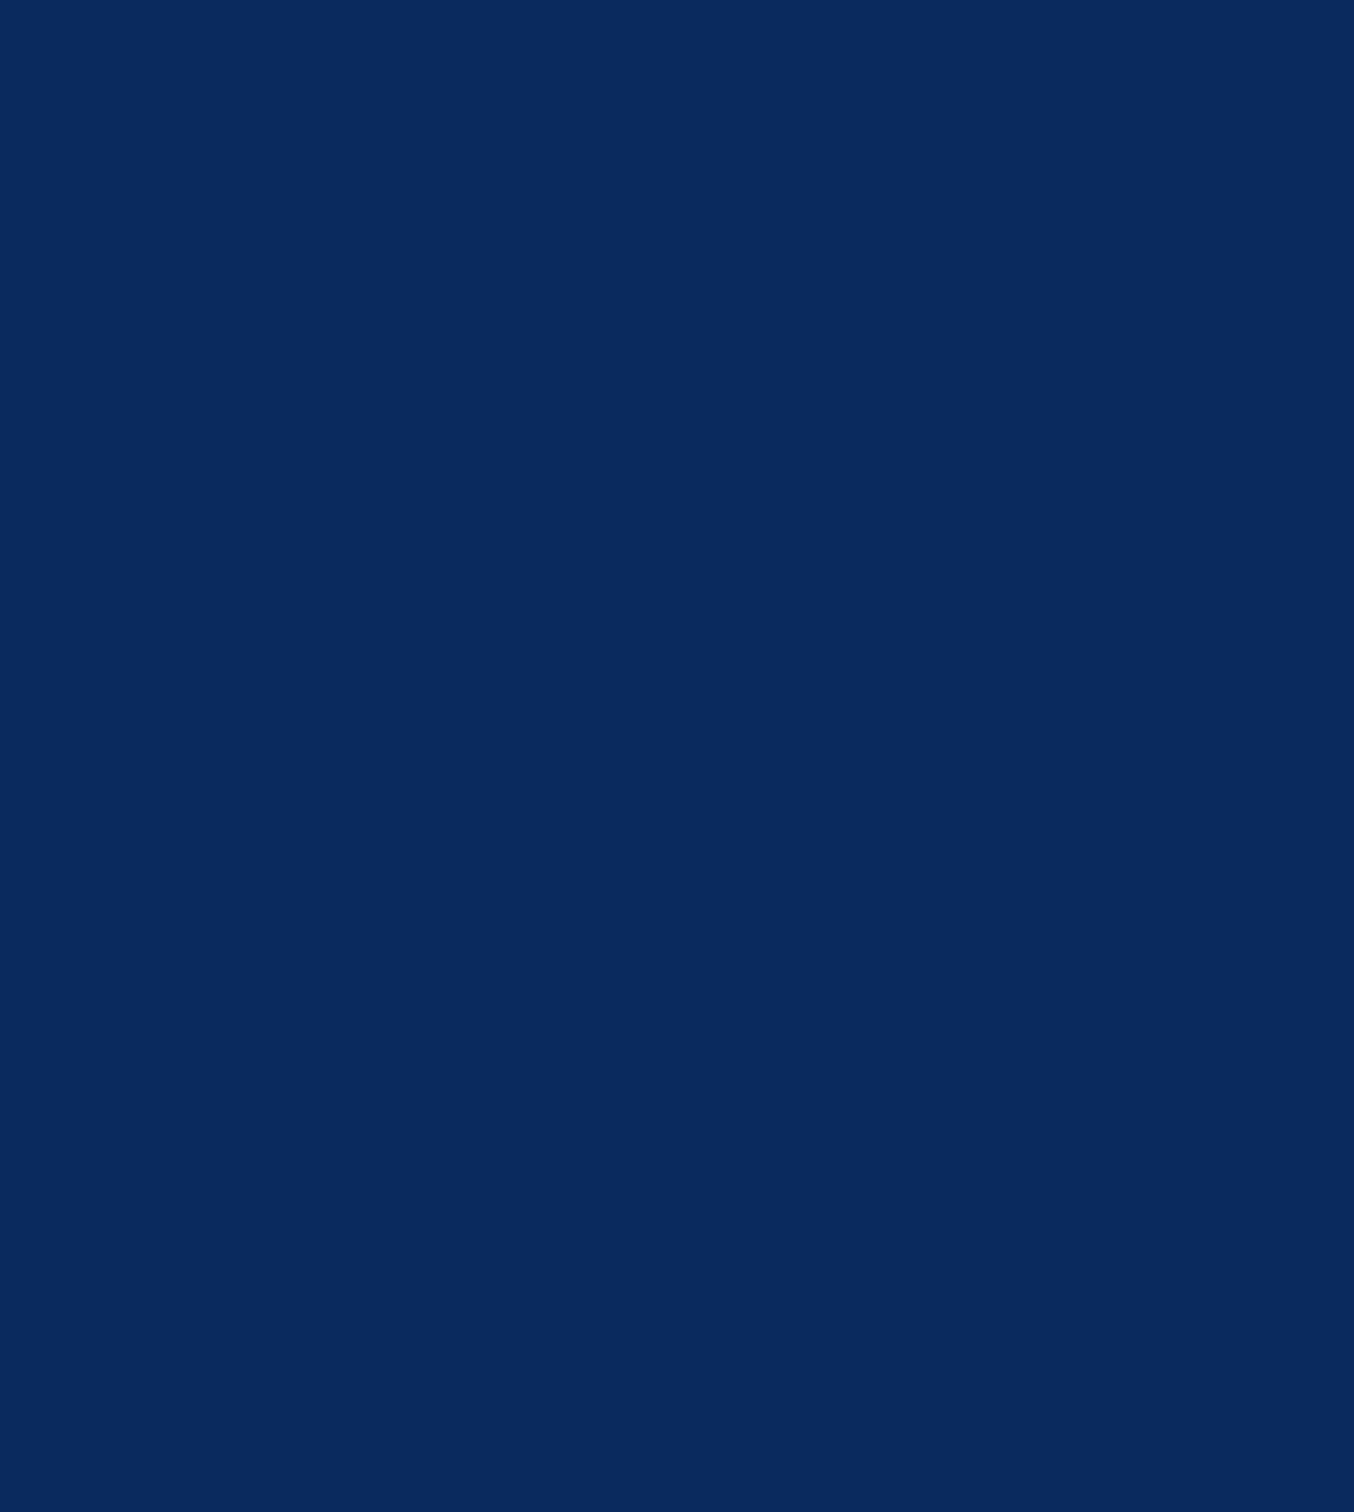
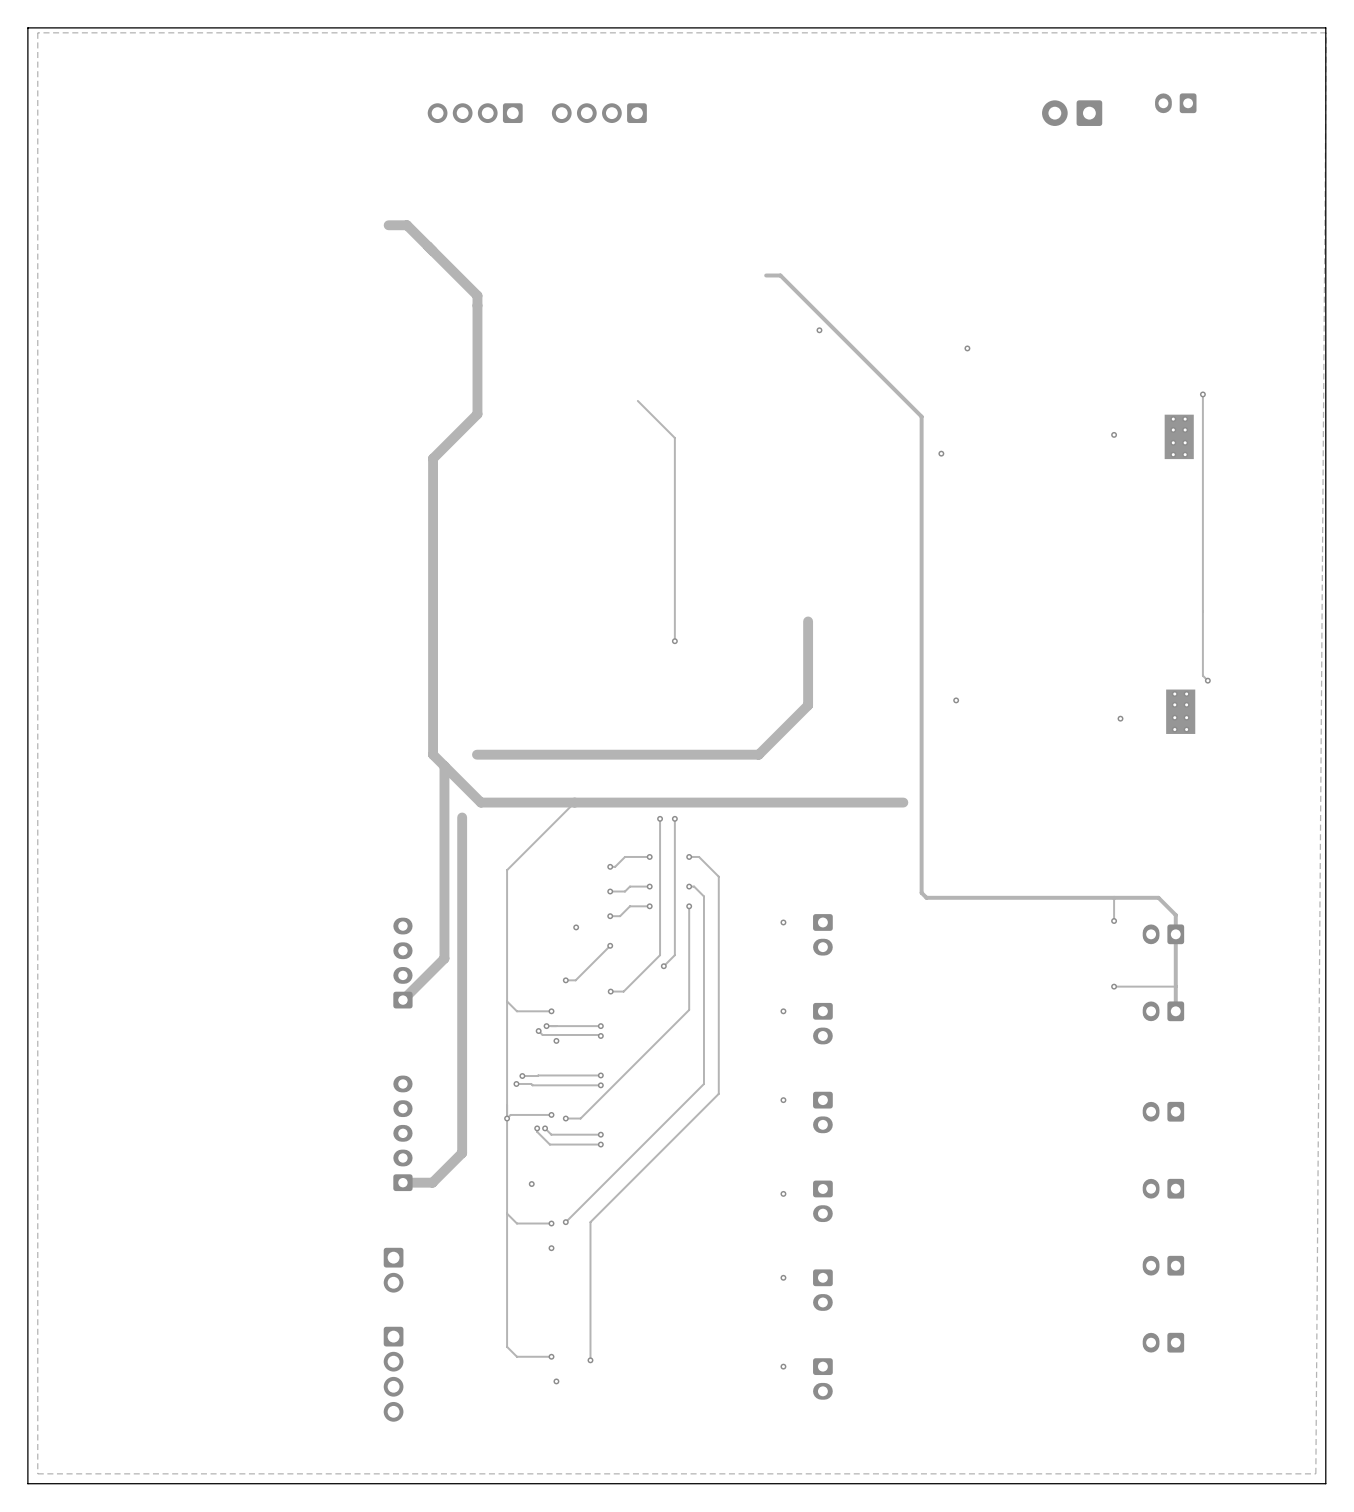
board edge: none -> (1325, 27) (27, 27) (27, 1483) (1325, 1483) (1325, 27)
zone outline: none -> (1326, 32) (1315, 1473) (37, 1473) (37, 32) (1326, 32)
part: none -> (1175, 103)
part: none -> (475, 113)
part: none -> (599, 113)
part: none -> (1072, 113)
track: none -> (388, 225) (406, 225) (477, 295) (477, 414) (433, 458) (433, 754) (480, 802) (903, 802)
track: none -> (766, 275) (780, 275) (921, 416) (921, 892) (926, 897) (1158, 897) (1175, 915) (1175, 1011)
via: none -> (819, 330)
via: none -> (967, 348)
track: none -> (1202, 394) (1202, 675) (1207, 680)
via: none -> (1202, 394)
track: none -> (637, 400) (674, 437) (674, 641)
via: none -> (1114, 434)
part: none -> (1179, 436)
via: none -> (941, 453)
track: none -> (808, 621) (808, 705) (758, 754) (476, 754)
via: none -> (674, 641)
via: none -> (1207, 680)
via: none -> (956, 700)
part: none -> (1180, 711)
via: none -> (1120, 718)
track: none -> (444, 766) (444, 958) (402, 1000)
track: none -> (574, 802) (507, 870) (507, 1346) (516, 1356) (551, 1356)
track: none -> (462, 817) (462, 1153) (432, 1182) (402, 1182)
track: none -> (660, 818) (660, 955) (623, 991) (610, 991)
via: none -> (660, 818)
track: none -> (674, 818) (674, 955) (663, 966)
via: none -> (674, 818)
track: none -> (649, 856) (625, 856) (615, 866) (610, 866)
via: none -> (649, 856)
track: none -> (689, 856) (699, 856) (718, 876) (718, 1093) (590, 1222) (590, 1360)
via: none -> (689, 856)
via: none -> (610, 866)
track: none -> (649, 886) (629, 886) (625, 891) (610, 891)
via: none -> (649, 886)
track: none -> (689, 886) (694, 886) (703, 896) (703, 1083) (565, 1222)
via: none -> (689, 886)
via: none -> (610, 891)
track: none -> (1114, 897) (1114, 921)
track: none -> (649, 906) (629, 906) (620, 916) (610, 916)
via: none -> (649, 906)
track: none -> (689, 906) (689, 1009) (580, 1118) (565, 1118)
via: none -> (689, 906)
via: none -> (610, 916)
via: none -> (1114, 921)
via: none -> (783, 922)
via: none -> (576, 927)
part: none -> (822, 934)
part: none -> (1163, 934)
track: none -> (610, 945) (575, 980) (565, 980)
via: none -> (610, 945)
part: none -> (402, 963)
via: none -> (663, 966)
via: none -> (565, 980)
via: none -> (1114, 986)
track: none -> (1175, 986) (1114, 986)
via: none -> (610, 991)
track: none -> (507, 1001) (516, 1011) (551, 1011)
via: none -> (551, 1011)
via: none -> (783, 1011)
part: none -> (1163, 1011)
part: none -> (822, 1023)
via: none -> (546, 1026)
track: none -> (600, 1026) (546, 1026)
via: none -> (600, 1026)
track: none -> (538, 1031) (542, 1034) (600, 1035)
via: none -> (538, 1031)
via: none -> (600, 1035)
via: none -> (556, 1040)
track: none -> (600, 1075) (522, 1076)
via: none -> (600, 1075)
via: none -> (522, 1076)
track: none -> (516, 1083) (600, 1085)
via: none -> (516, 1083)
via: none -> (600, 1085)
via: none -> (783, 1100)
part: none -> (1163, 1111)
part: none -> (822, 1112)
track: none -> (551, 1114) (510, 1114) (507, 1118)
via: none -> (551, 1114)
via: none -> (507, 1118)
via: none -> (565, 1118)
track: none -> (537, 1128) (537, 1131) (549, 1144) (600, 1144)
via: none -> (537, 1128)
track: none -> (545, 1128) (551, 1134) (600, 1134)
via: none -> (545, 1128)
part: none -> (402, 1133)
via: none -> (600, 1134)
via: none -> (600, 1144)
via: none -> (531, 1184)
part: none -> (1163, 1188)
via: none -> (783, 1193)
part: none -> (822, 1201)
track: none -> (507, 1213) (516, 1223) (551, 1223)
via: none -> (565, 1222)
via: none -> (551, 1223)
via: none -> (551, 1248)
part: none -> (1163, 1265)
part: none -> (393, 1270)
via: none -> (783, 1277)
part: none -> (822, 1290)
part: none -> (1163, 1342)
via: none -> (551, 1356)
via: none -> (590, 1360)
via: none -> (783, 1366)
part: none -> (393, 1374)
part: none -> (822, 1378)
via: none -> (556, 1381)

